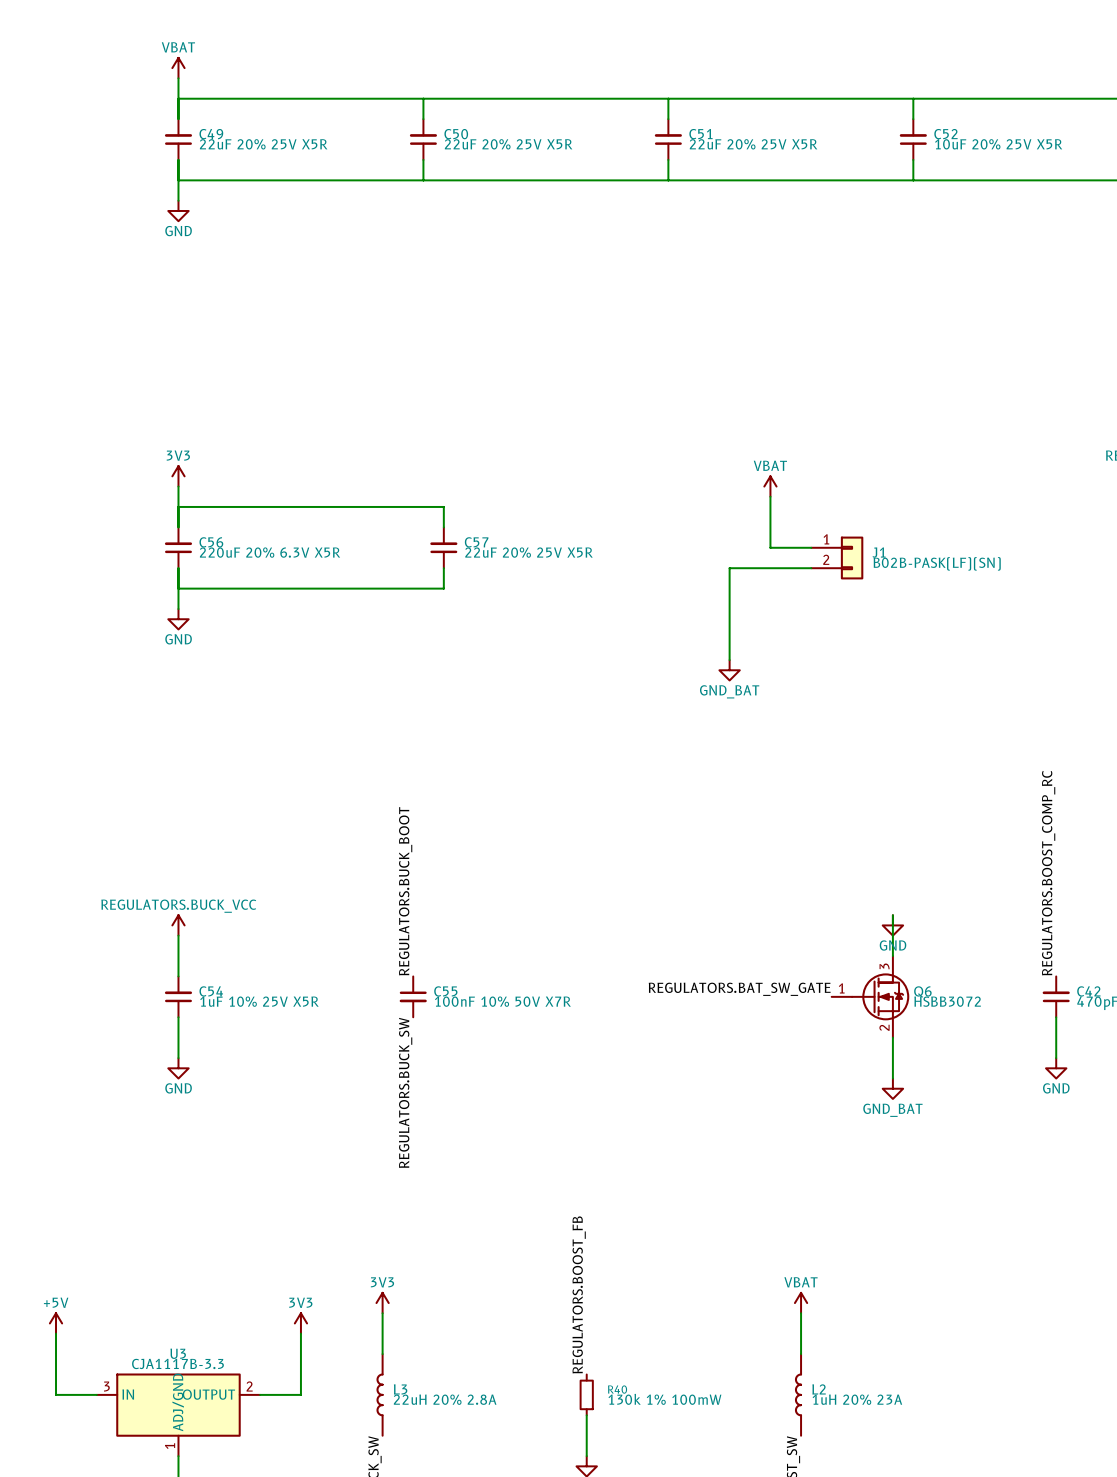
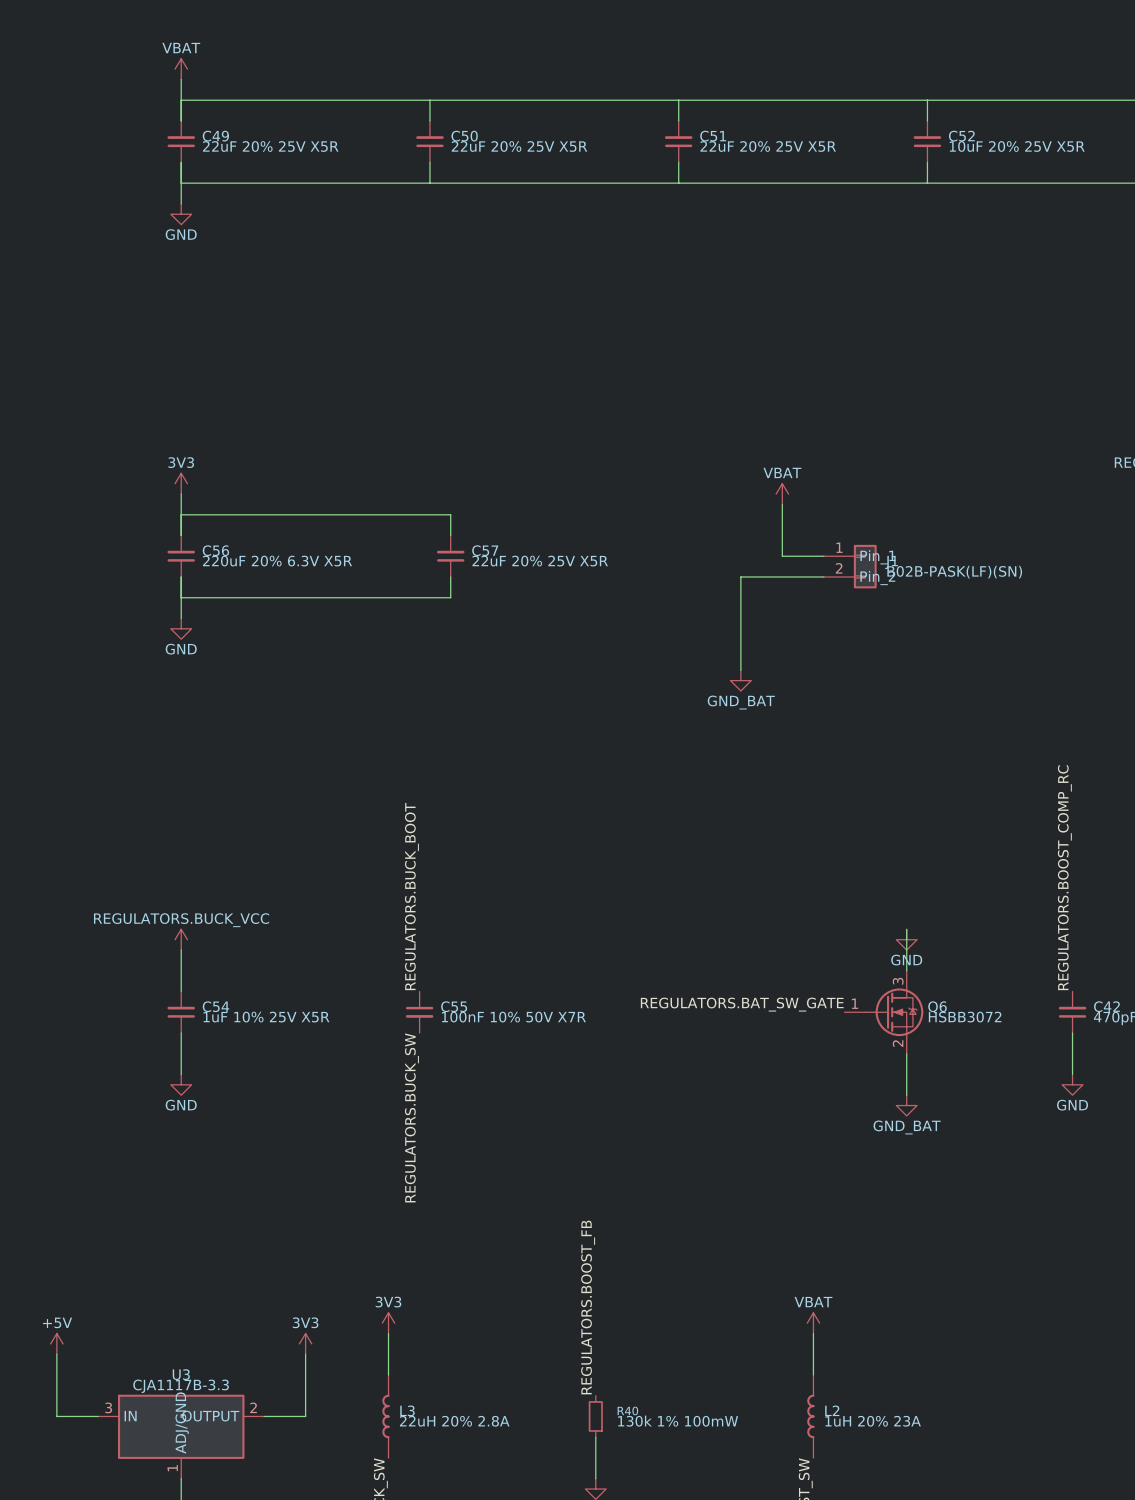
J1 pin name: none -> Pin_1 (877, 557)
J1 pin name: none -> Pin_2 (877, 578)

